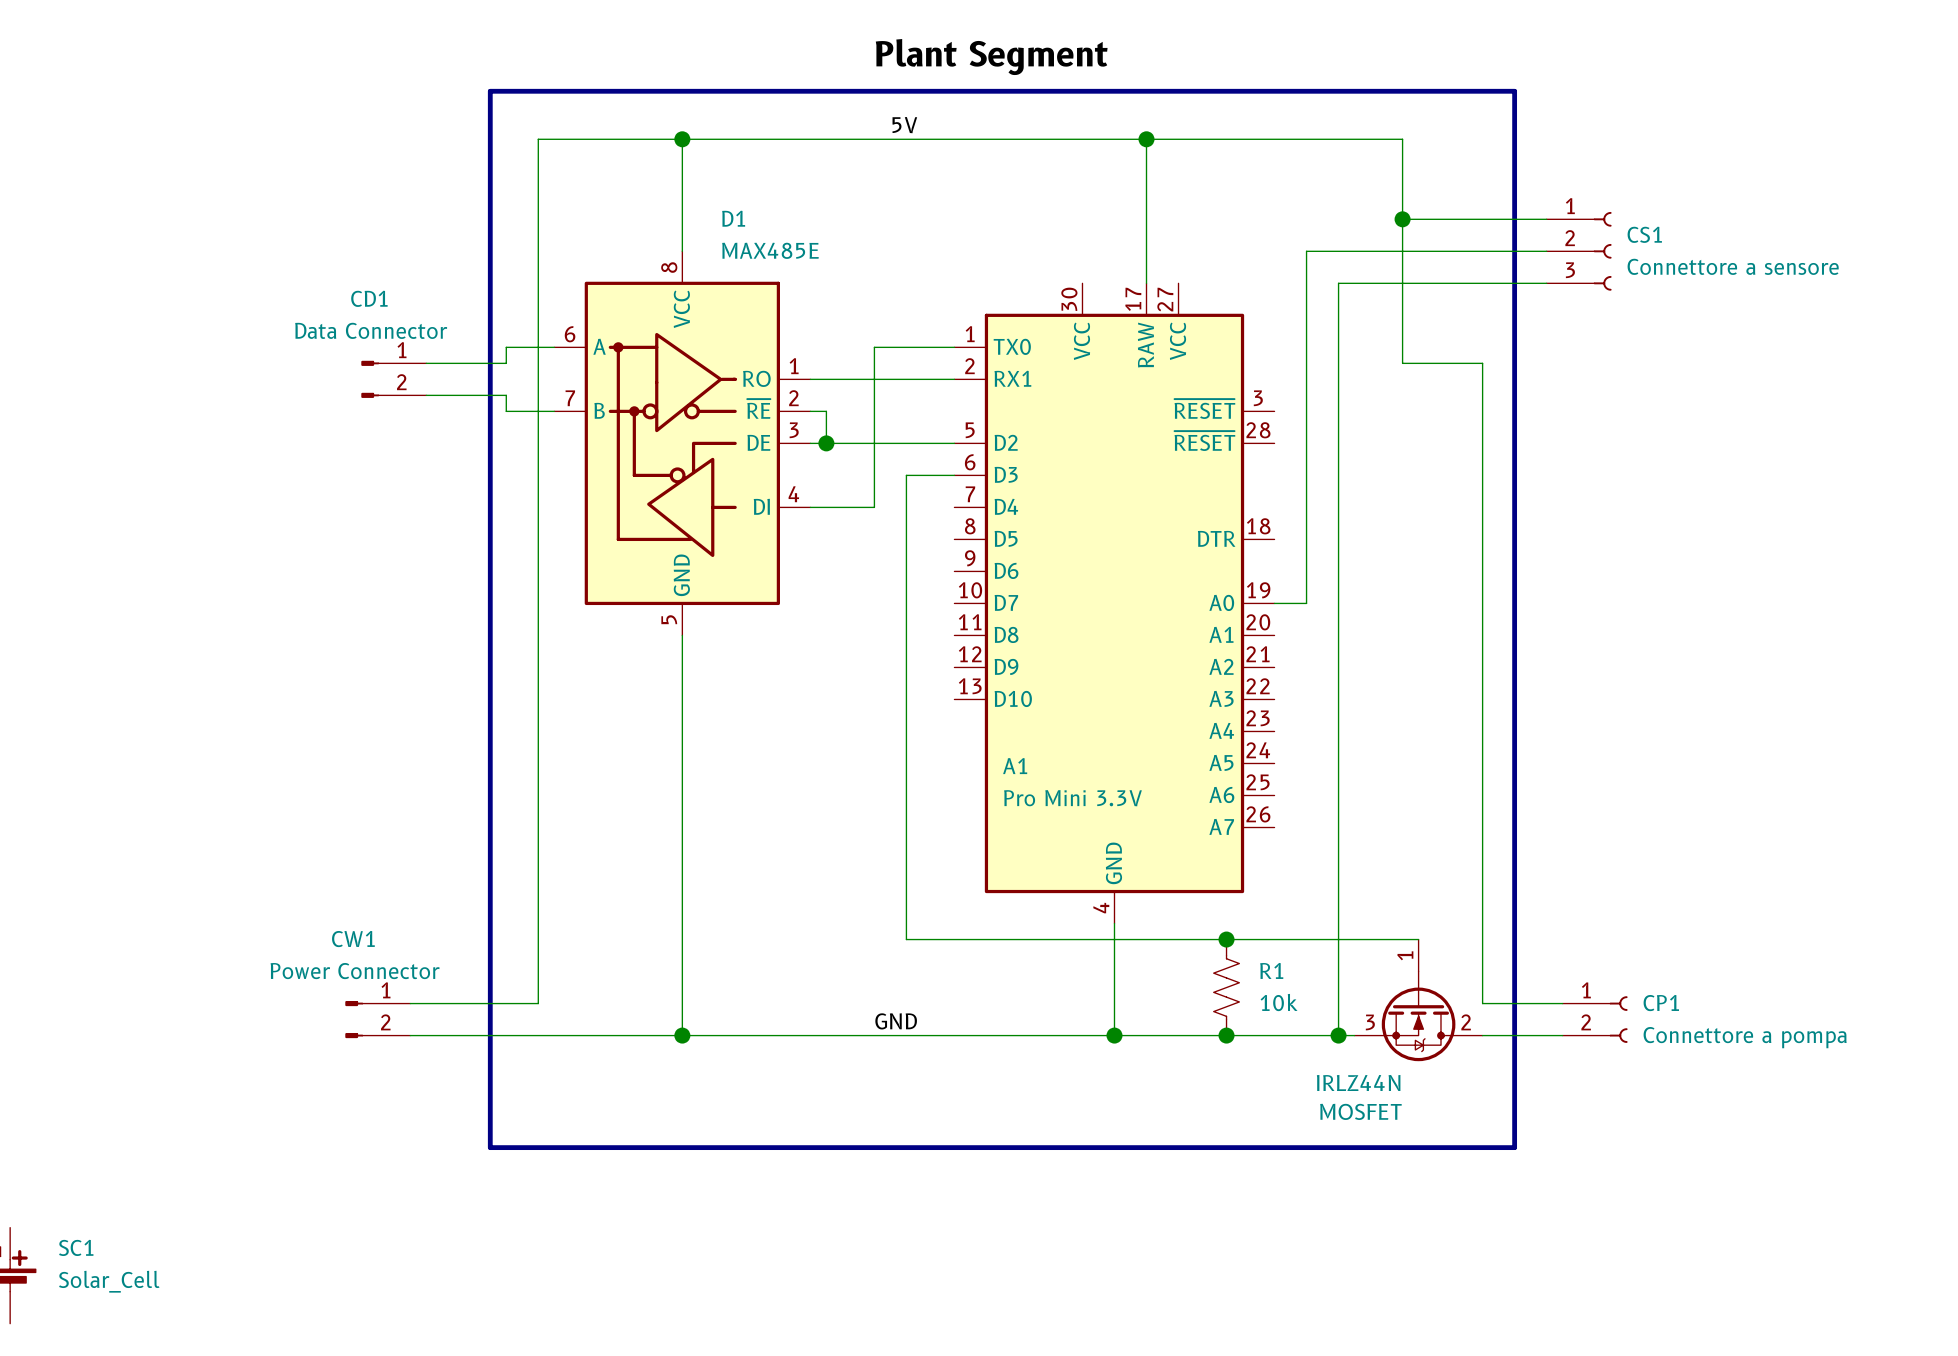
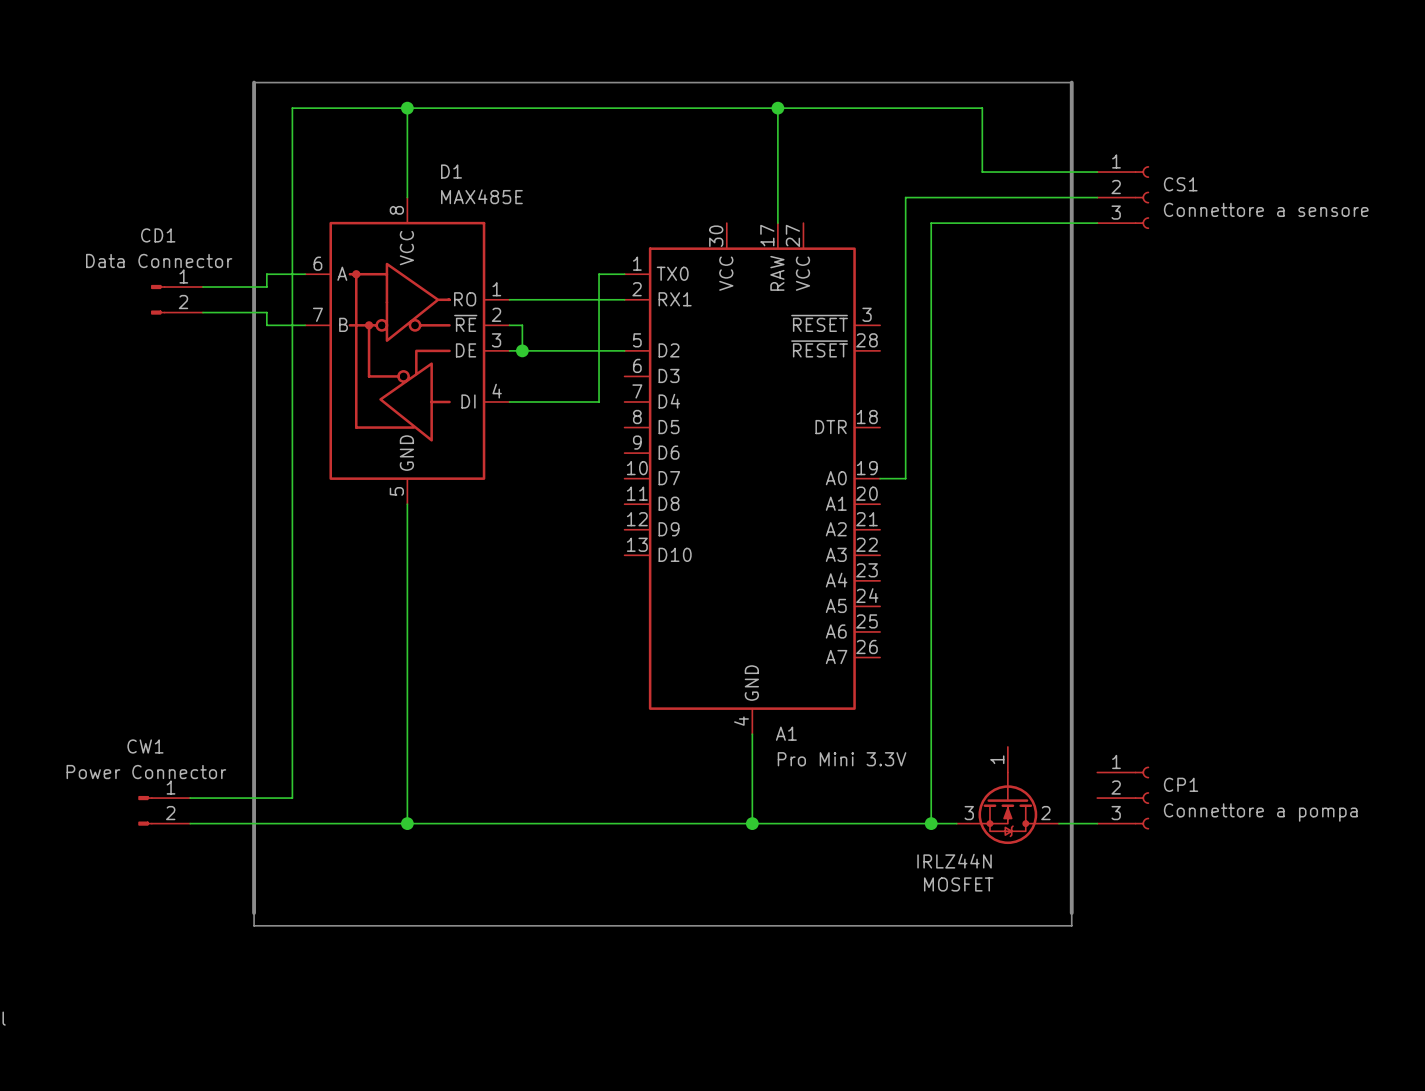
label: Plant Segment (991, 57) -> none
line: (490, 107) (490, 91) (1514, 91) (1514, 107) -> (254, 82) (1071, 82)
label: 5V (904, 125) -> none
wire: (1402, 219) (1402, 363) (1482, 363) (1482, 1003) (1562, 1003) -> none
junction: (1402, 219) -> none
wire: (922, 347) (874, 347) (874, 507) -> (599, 274) (599, 401) (560, 401)
wire: (954, 475) (906, 475) (906, 939) (1418, 939) -> none
A1 name position: A1 (1015, 766) -> A1 (786, 733)
A1 value position: Pro Mini 3.3V (1072, 798) -> Pro Mini 3.3V (842, 759)
junction: (1226, 939) -> none
R1: 10k (1226, 987) -> none
CP1 symbol: [1562, 996, 1628, 1043] -> [1097, 766, 1150, 830]
MOSFET position: (1418, 1000) -> (1007, 795)
label: GND (896, 1021) -> none
junction: (1226, 1035) -> none
line: (490, 1147) (1514, 1147) -> (254, 913) (254, 925) (1071, 925) (1071, 913)

